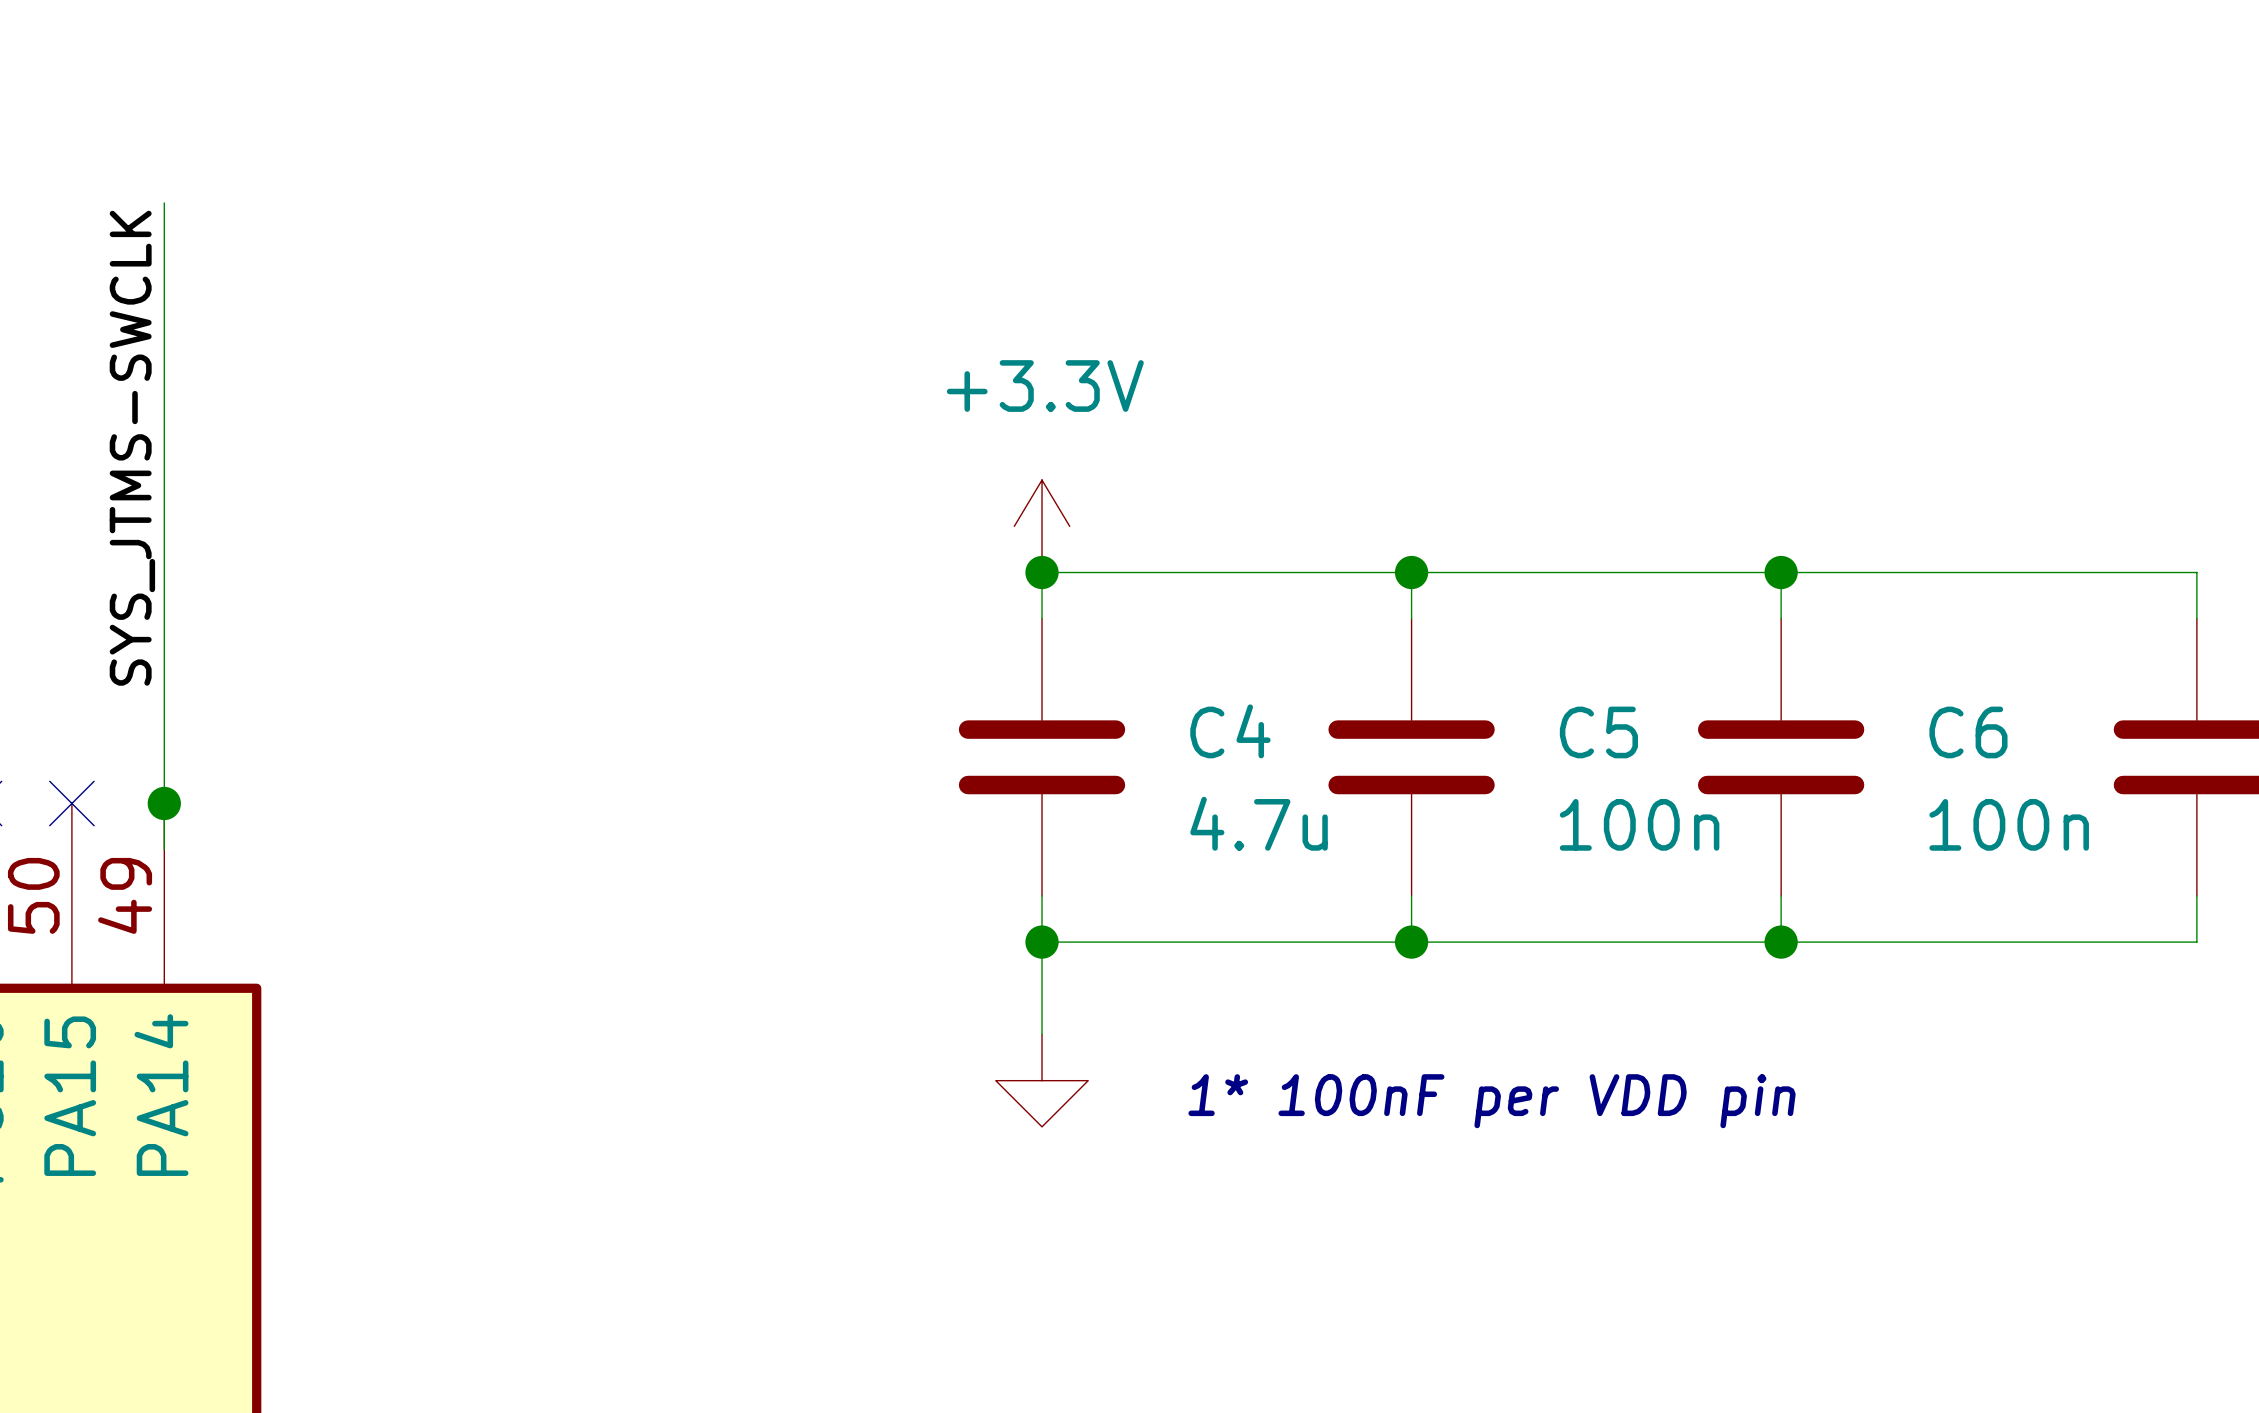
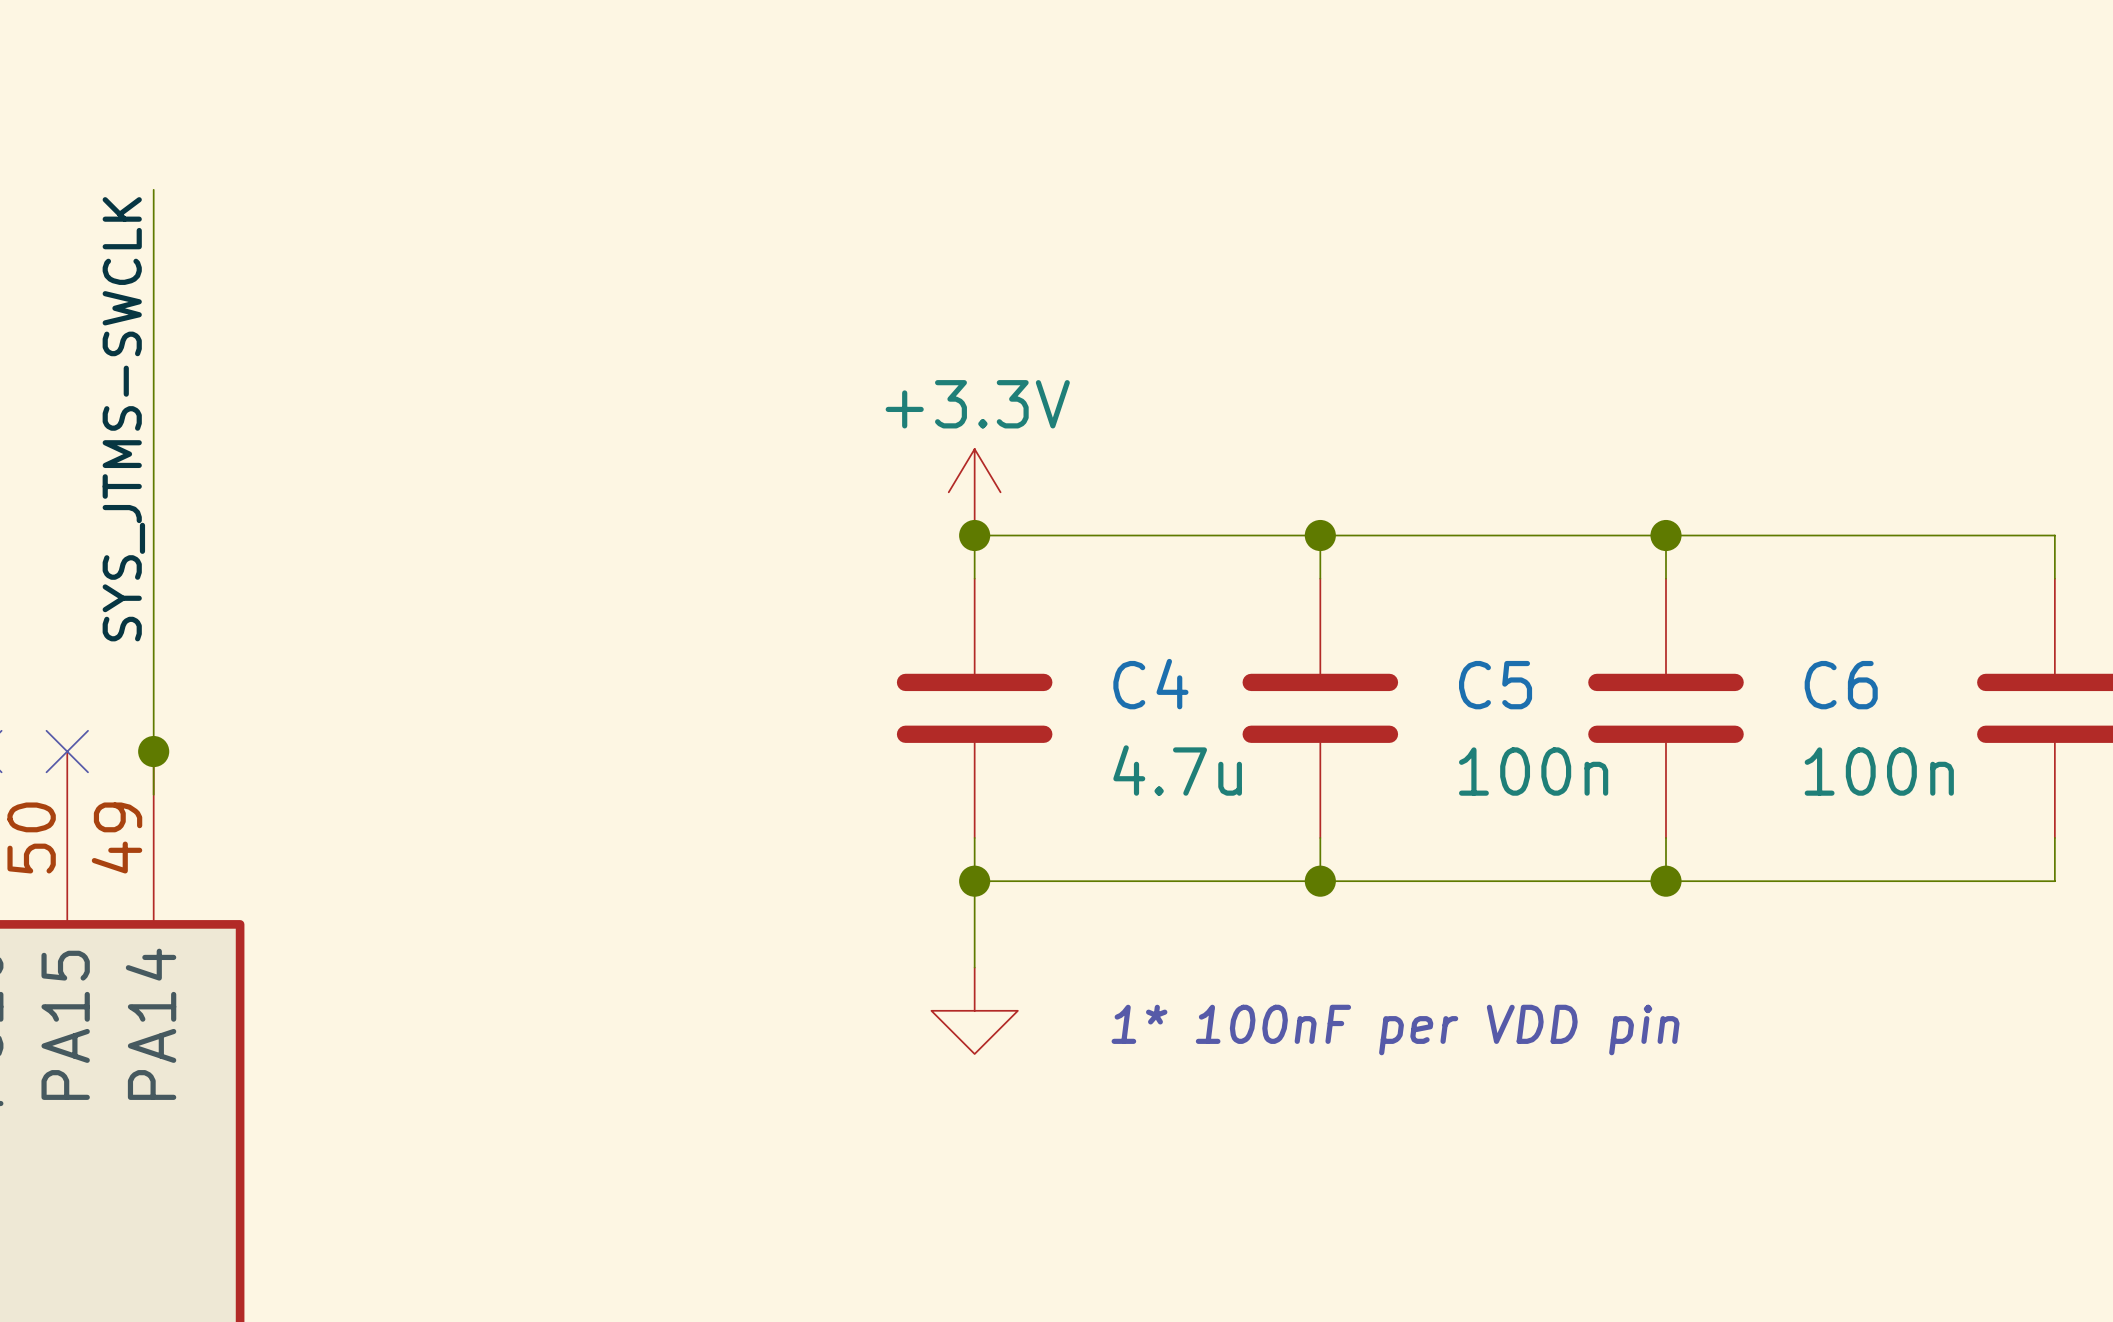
power symbol text position: +3.3V (1045, 386) -> +3.3V (977, 404)

